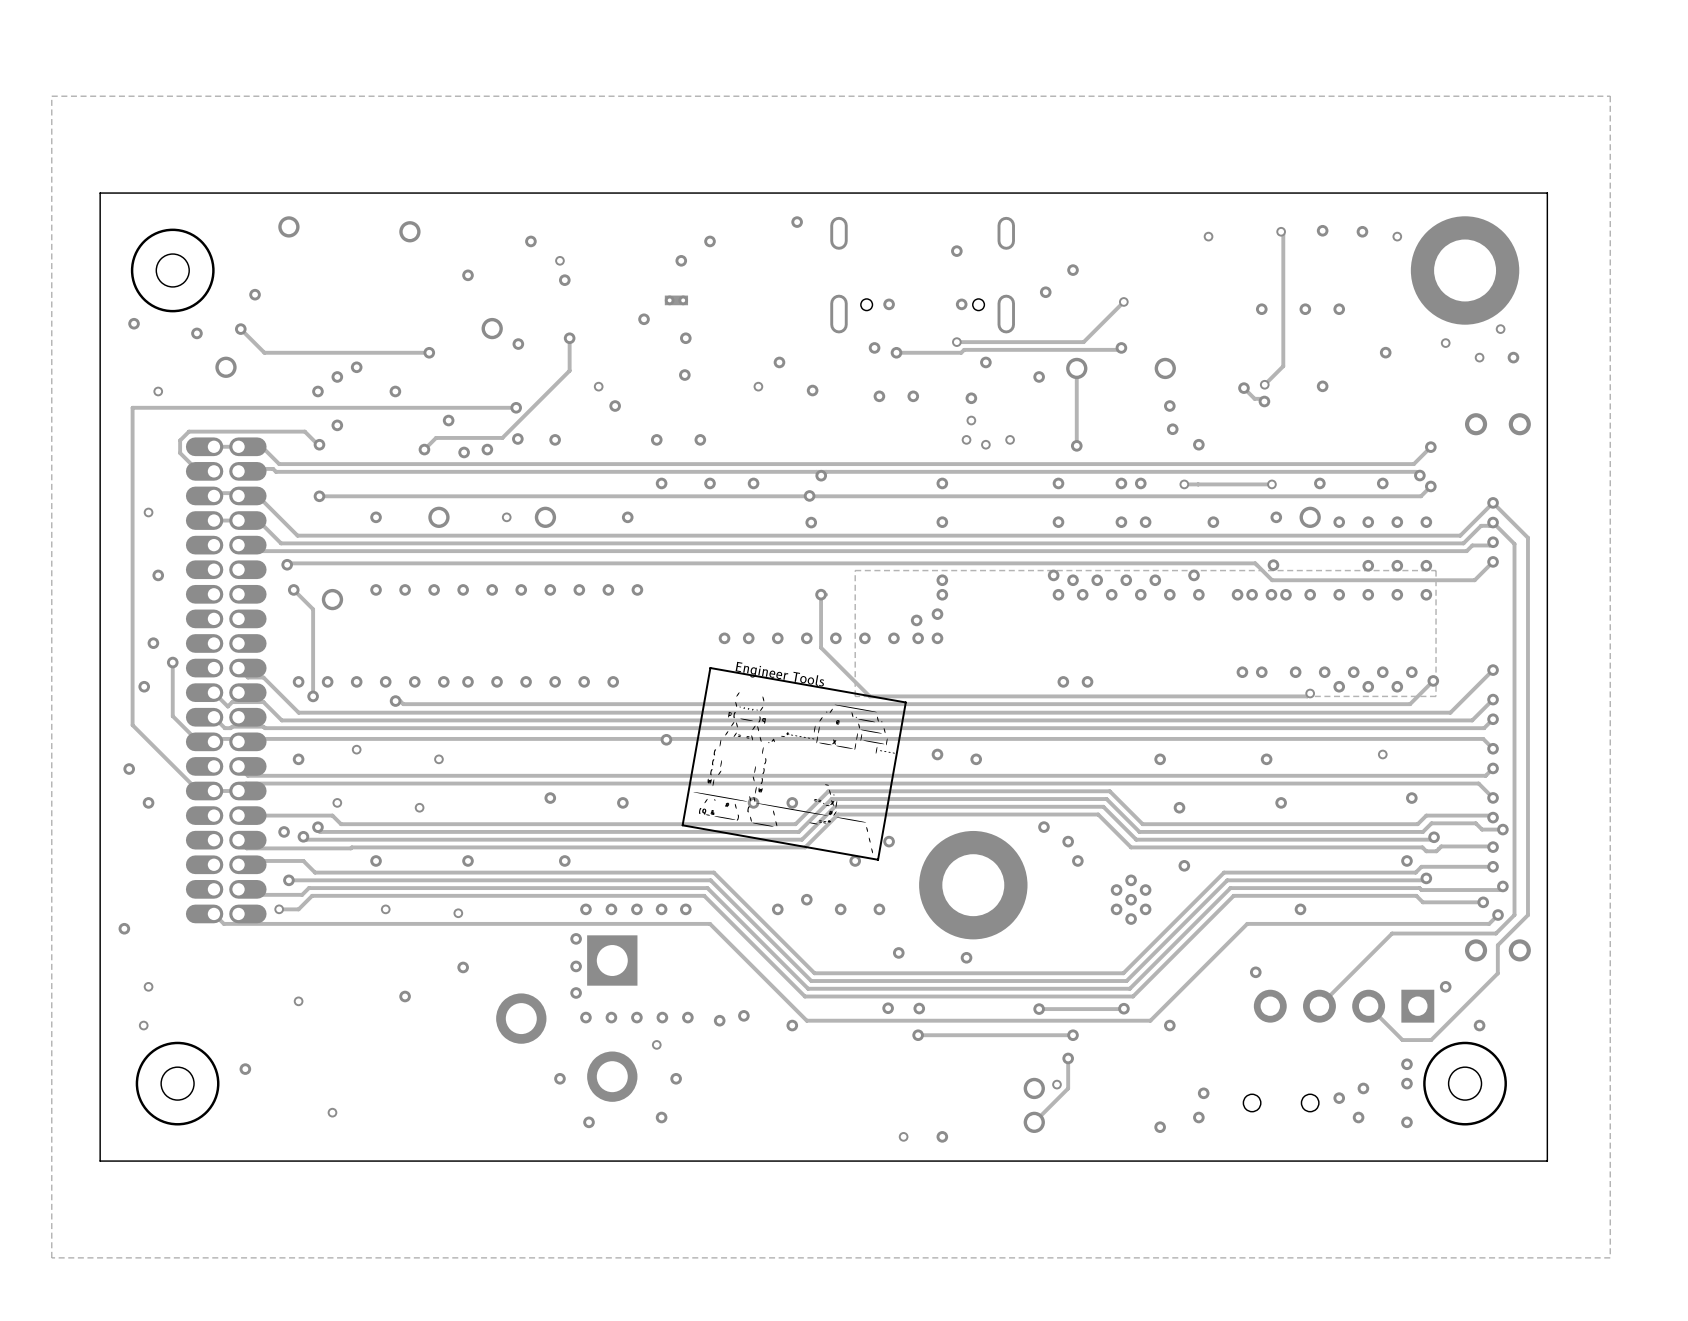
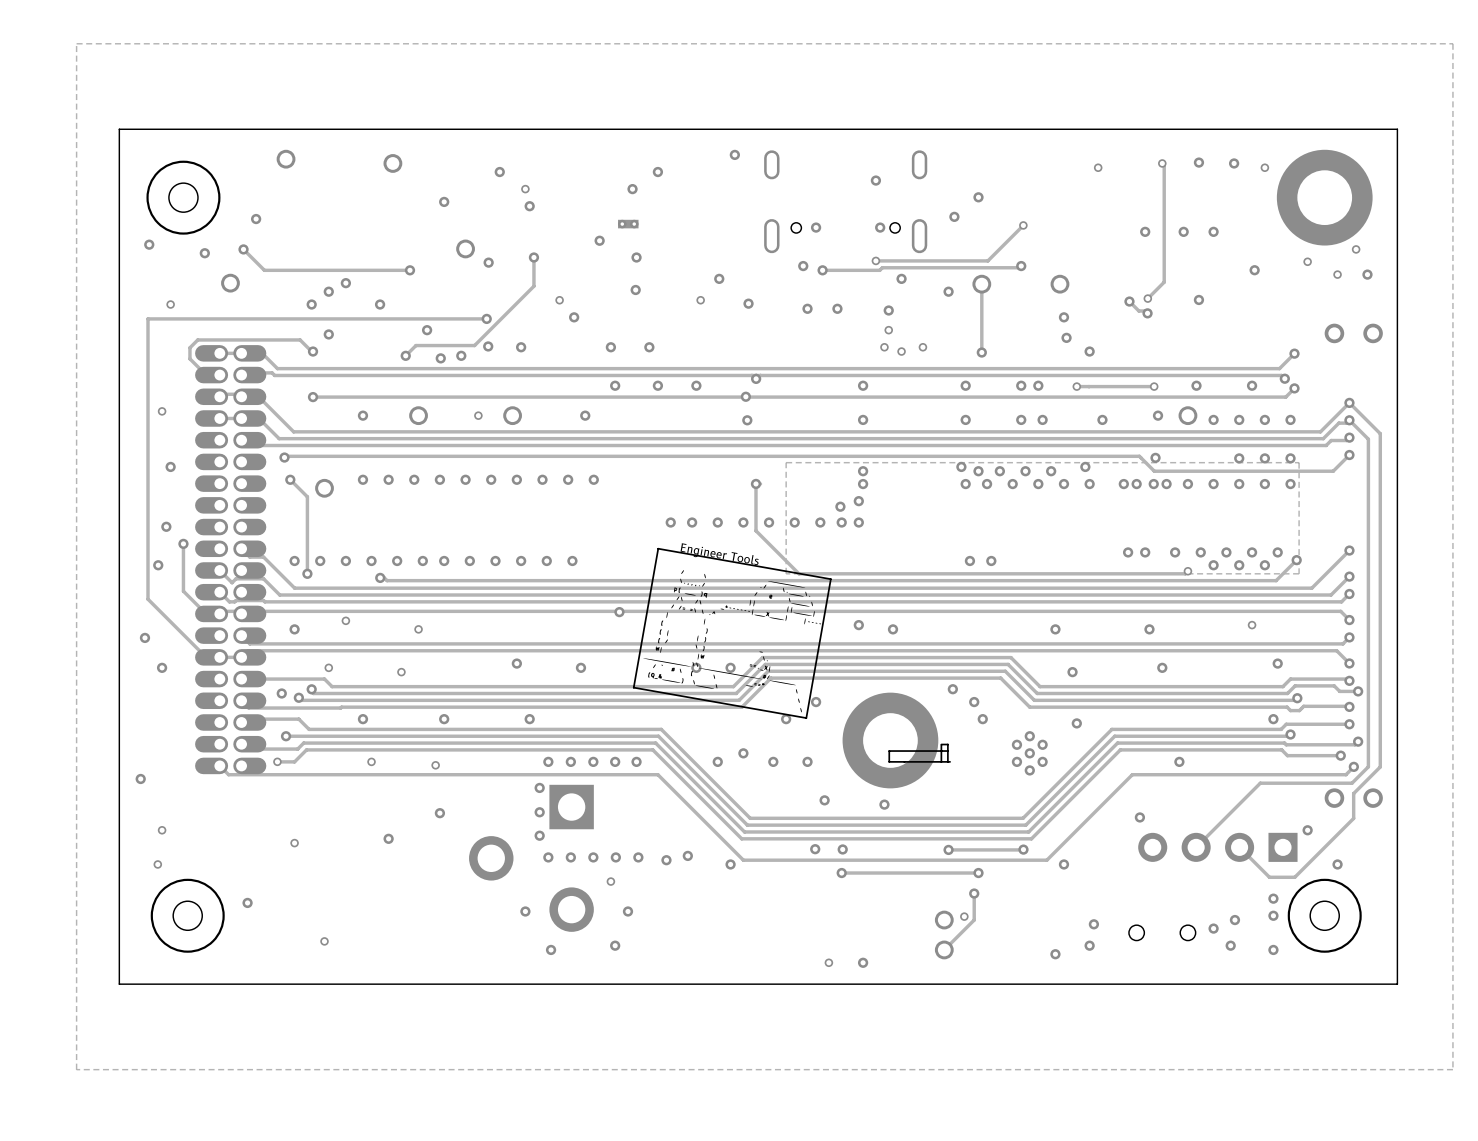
line: none -> (941, 744) (947, 744) (947, 761)
line: none -> (941, 745) (941, 761)
line: none -> (947, 751) (889, 751) (889, 761) (950, 761)

